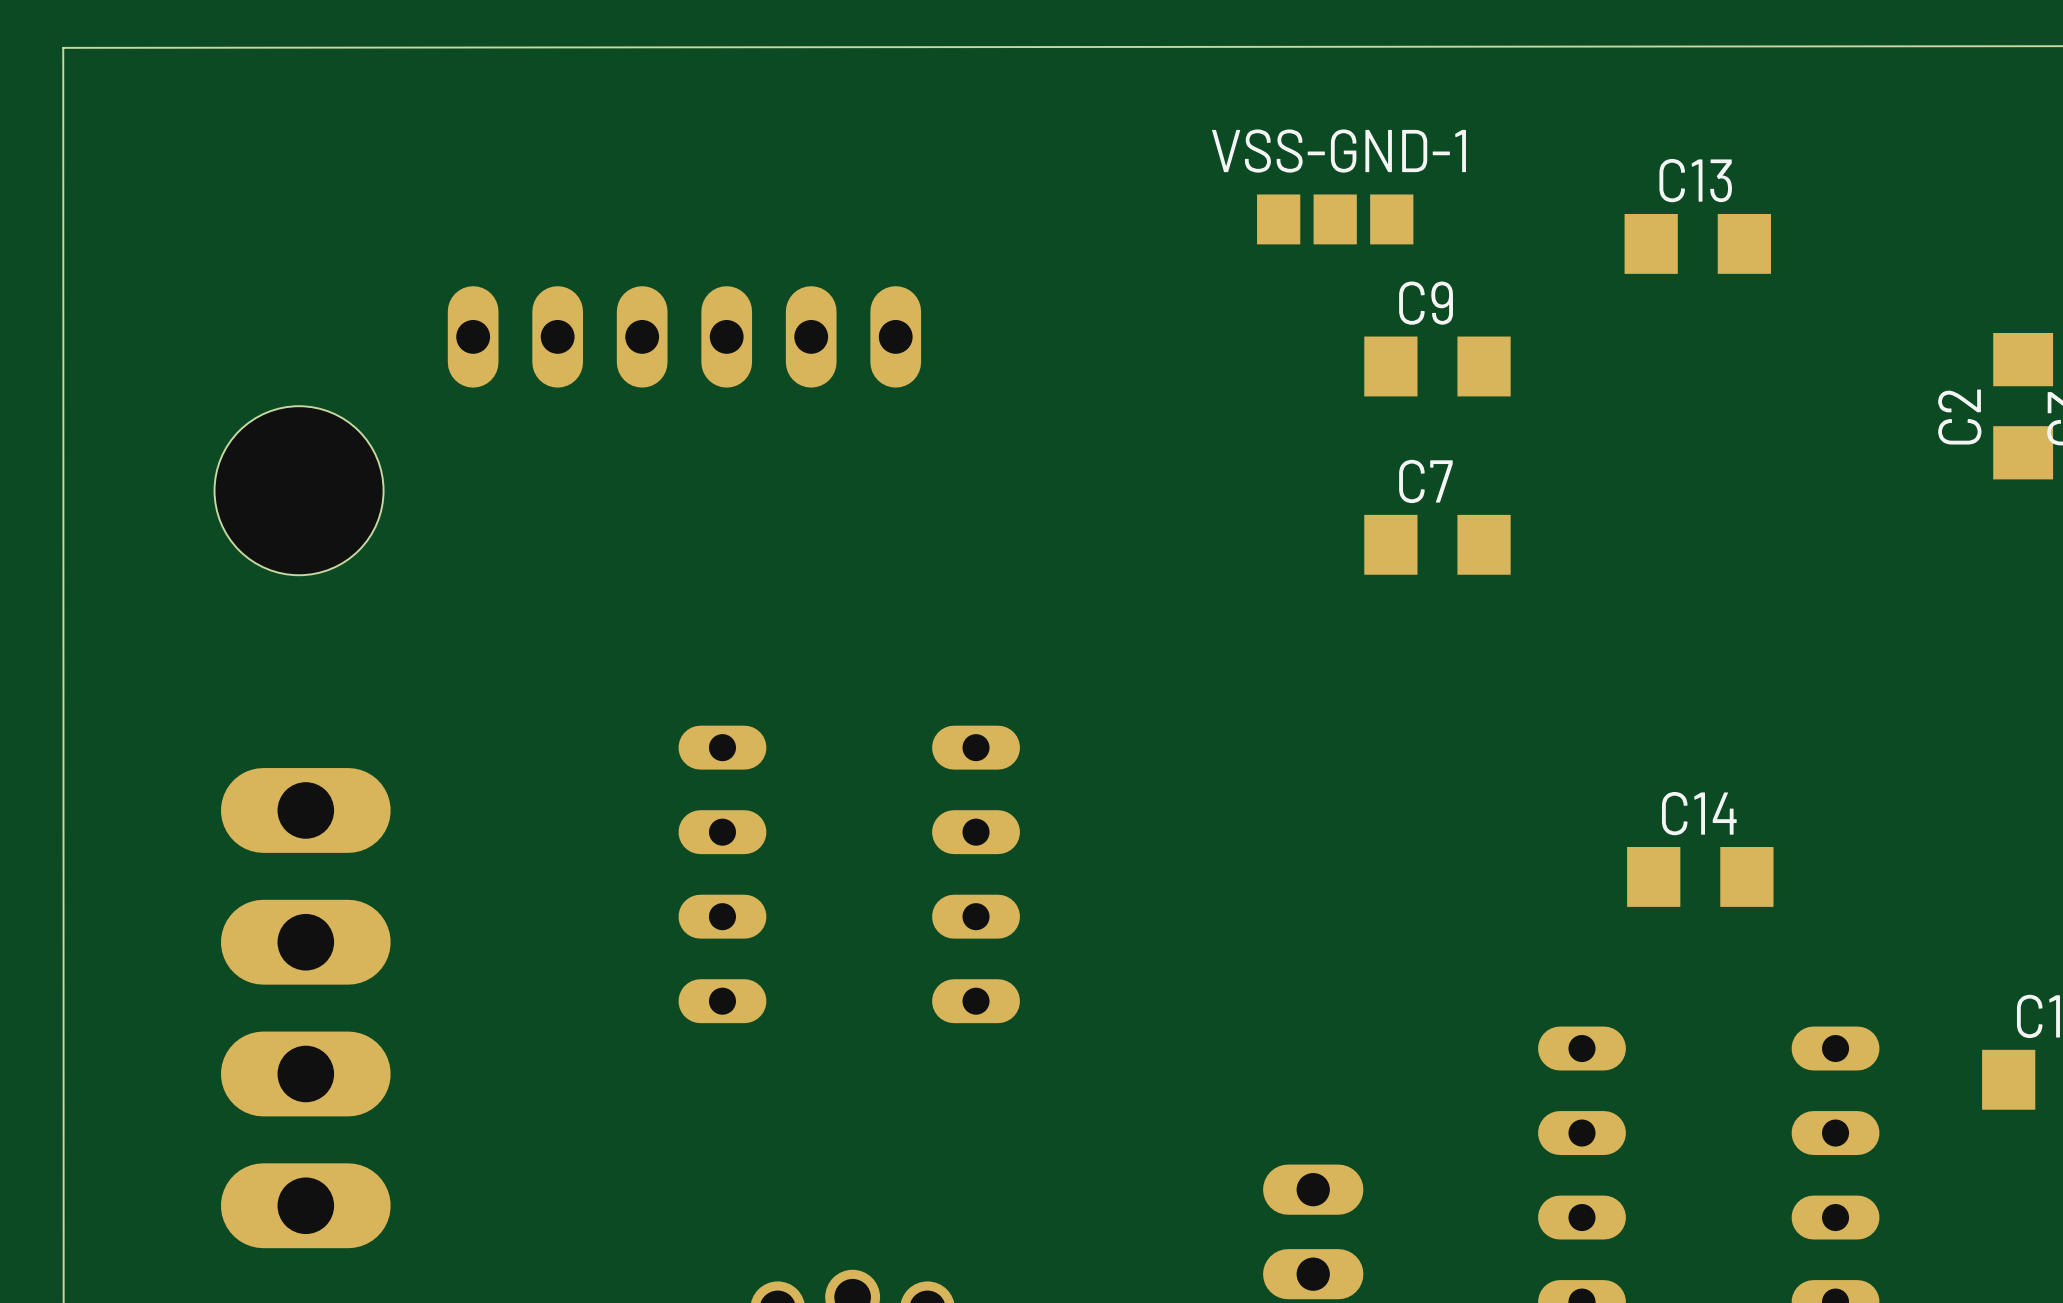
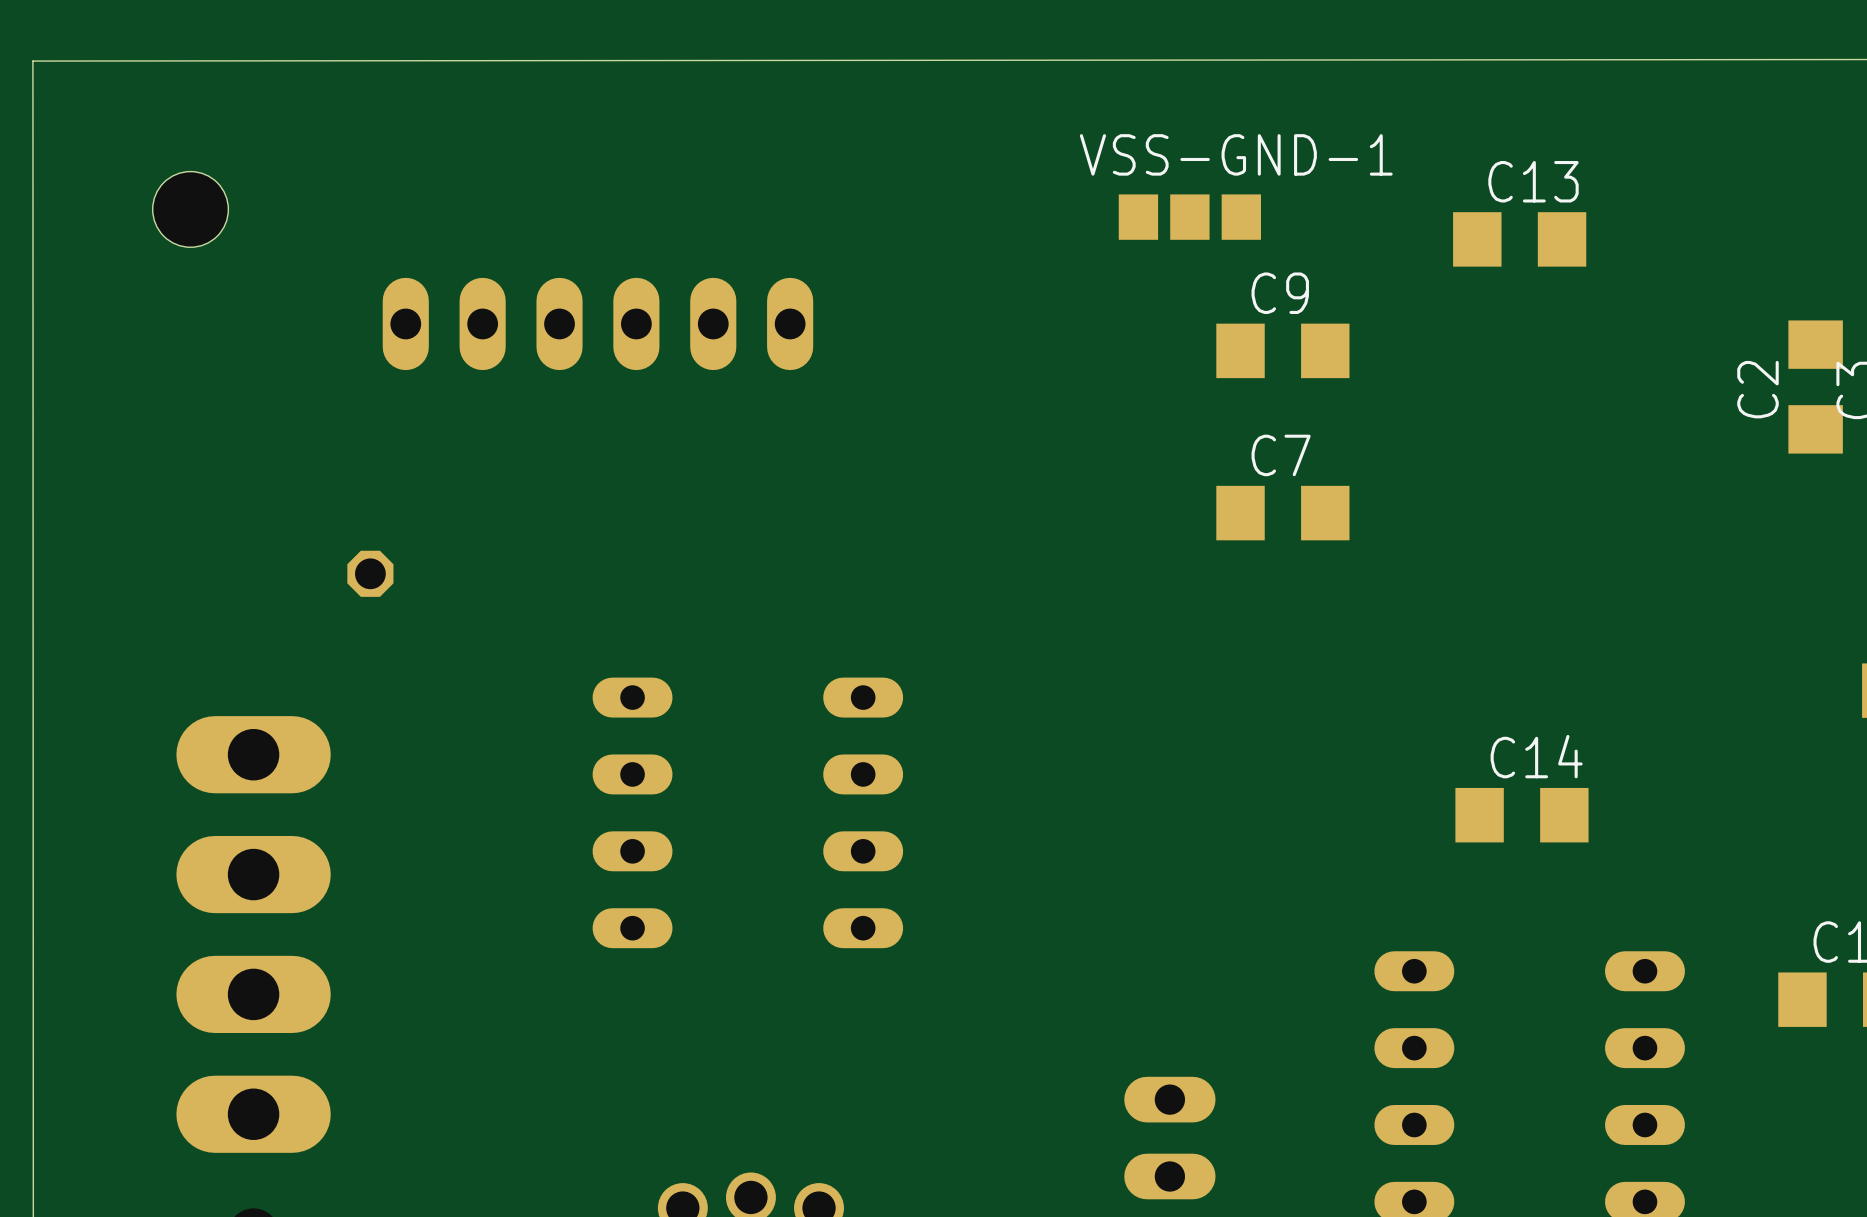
hole: none -> (190, 209)
hole: (299, 490) -> none
part: none -> (370, 573)

